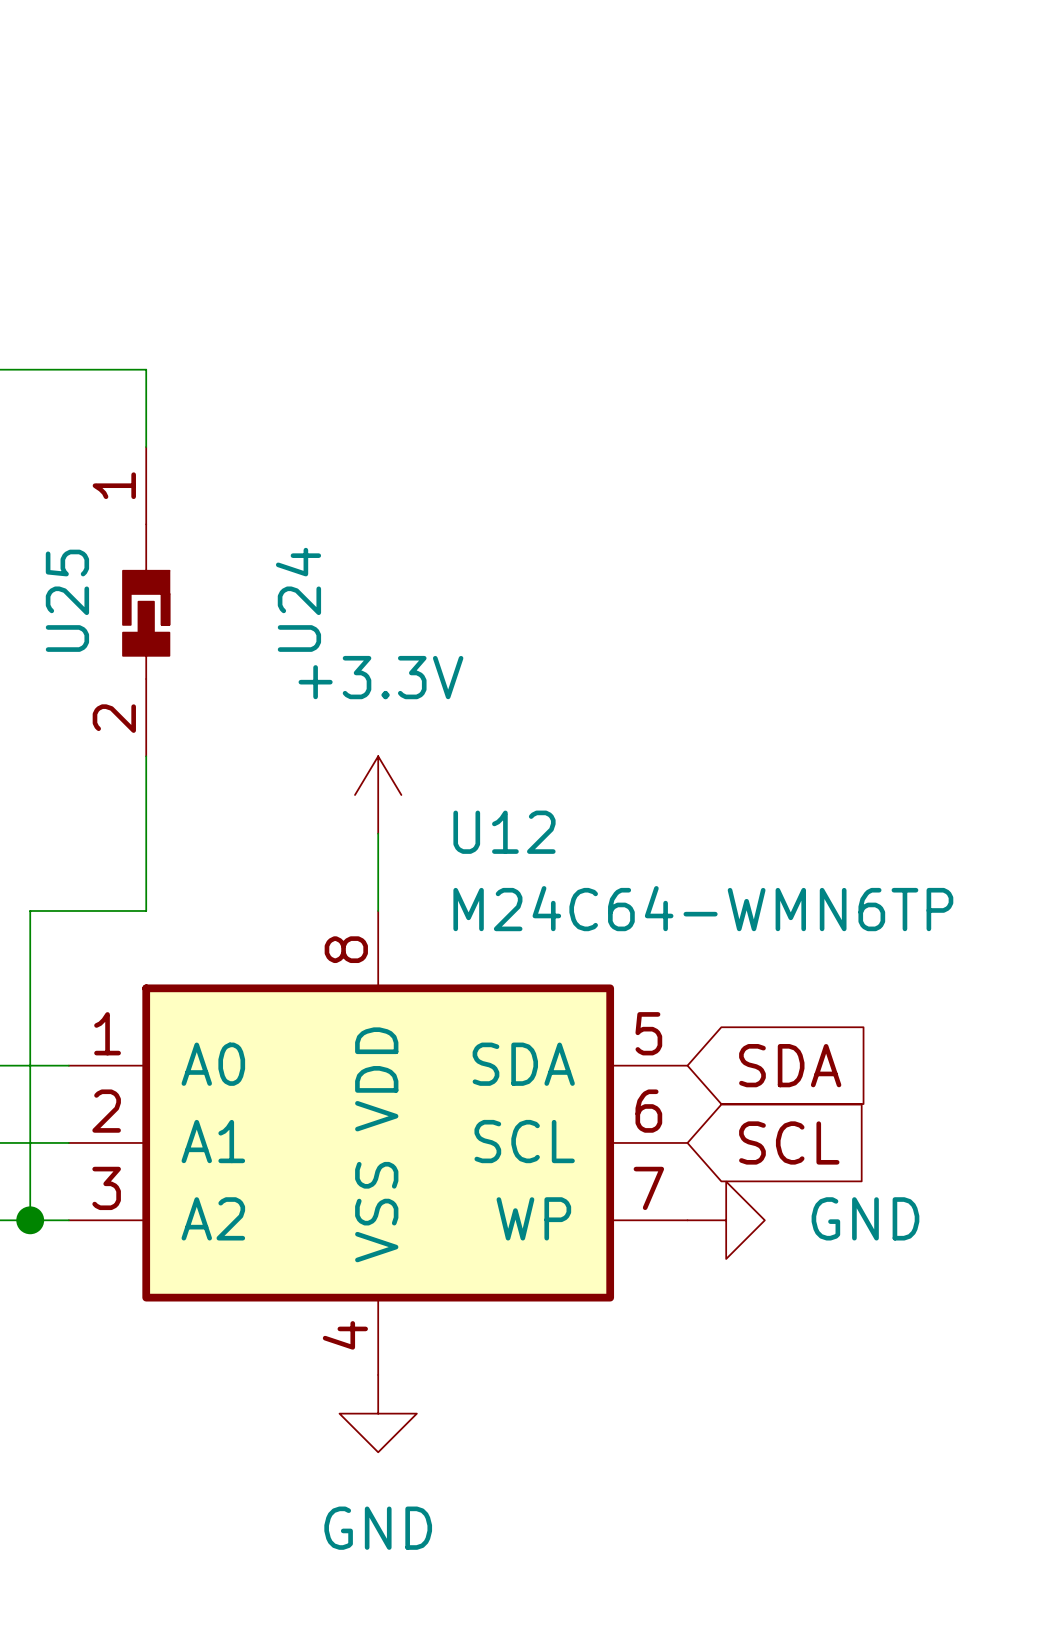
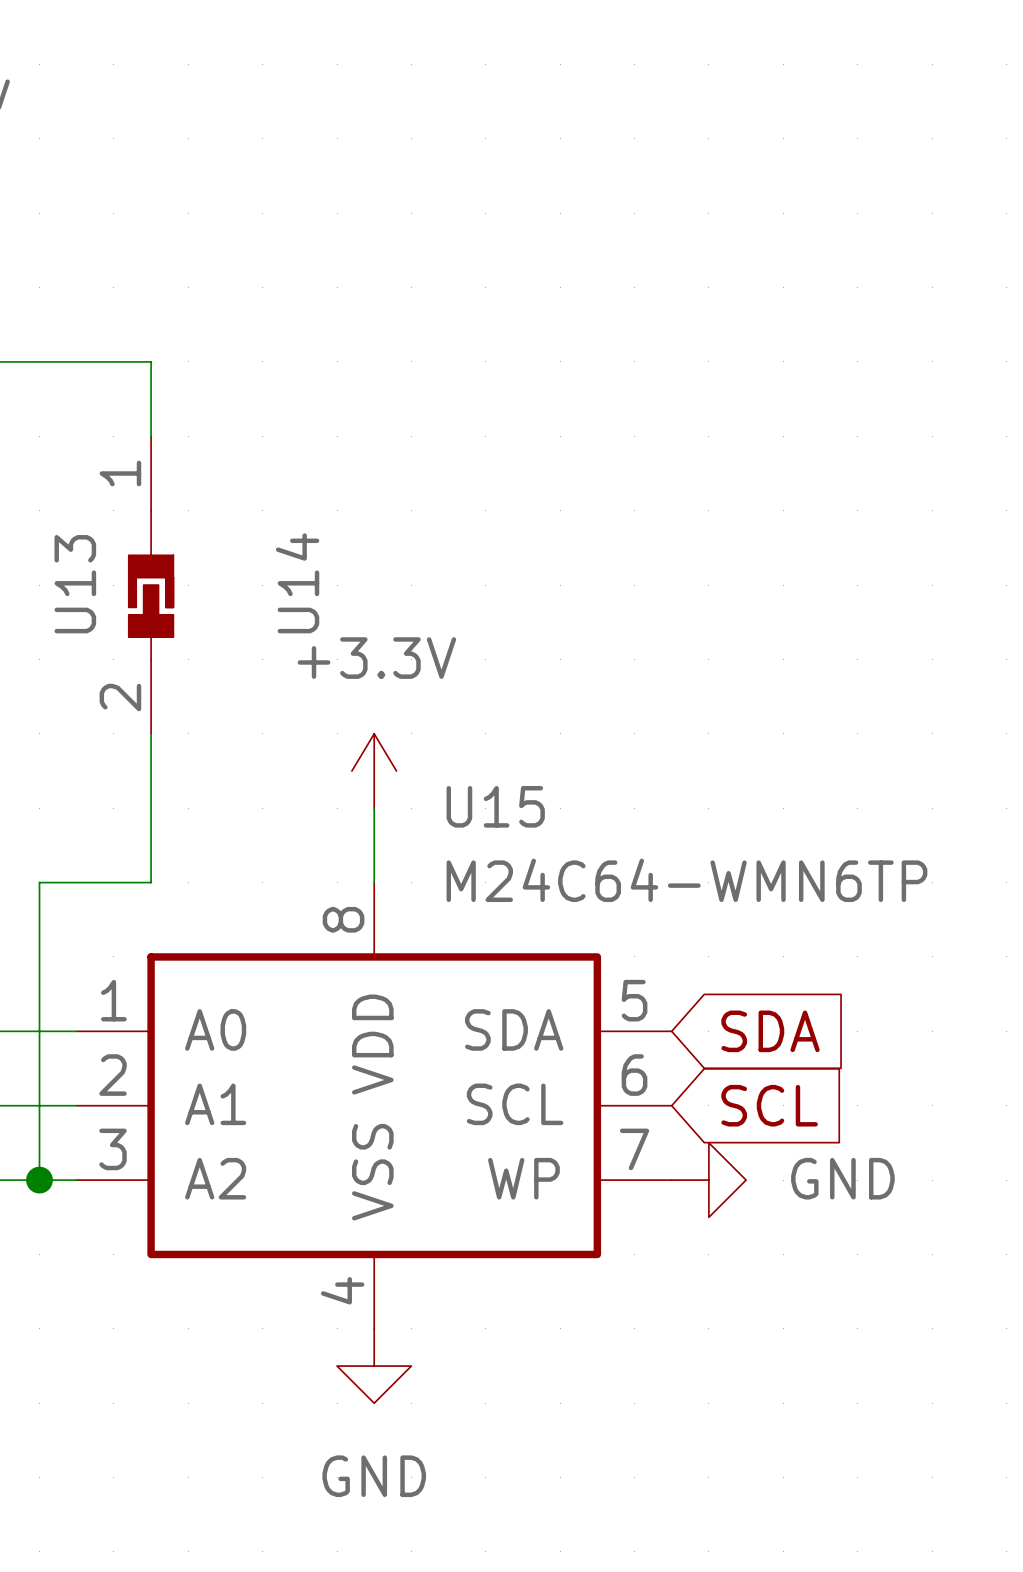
U24 name: U24 (298, 599) -> U14 (297, 583)
U25 name: U25 (67, 600) -> U13 (75, 584)
U12 name: U12 (504, 832) -> U15 (495, 806)

